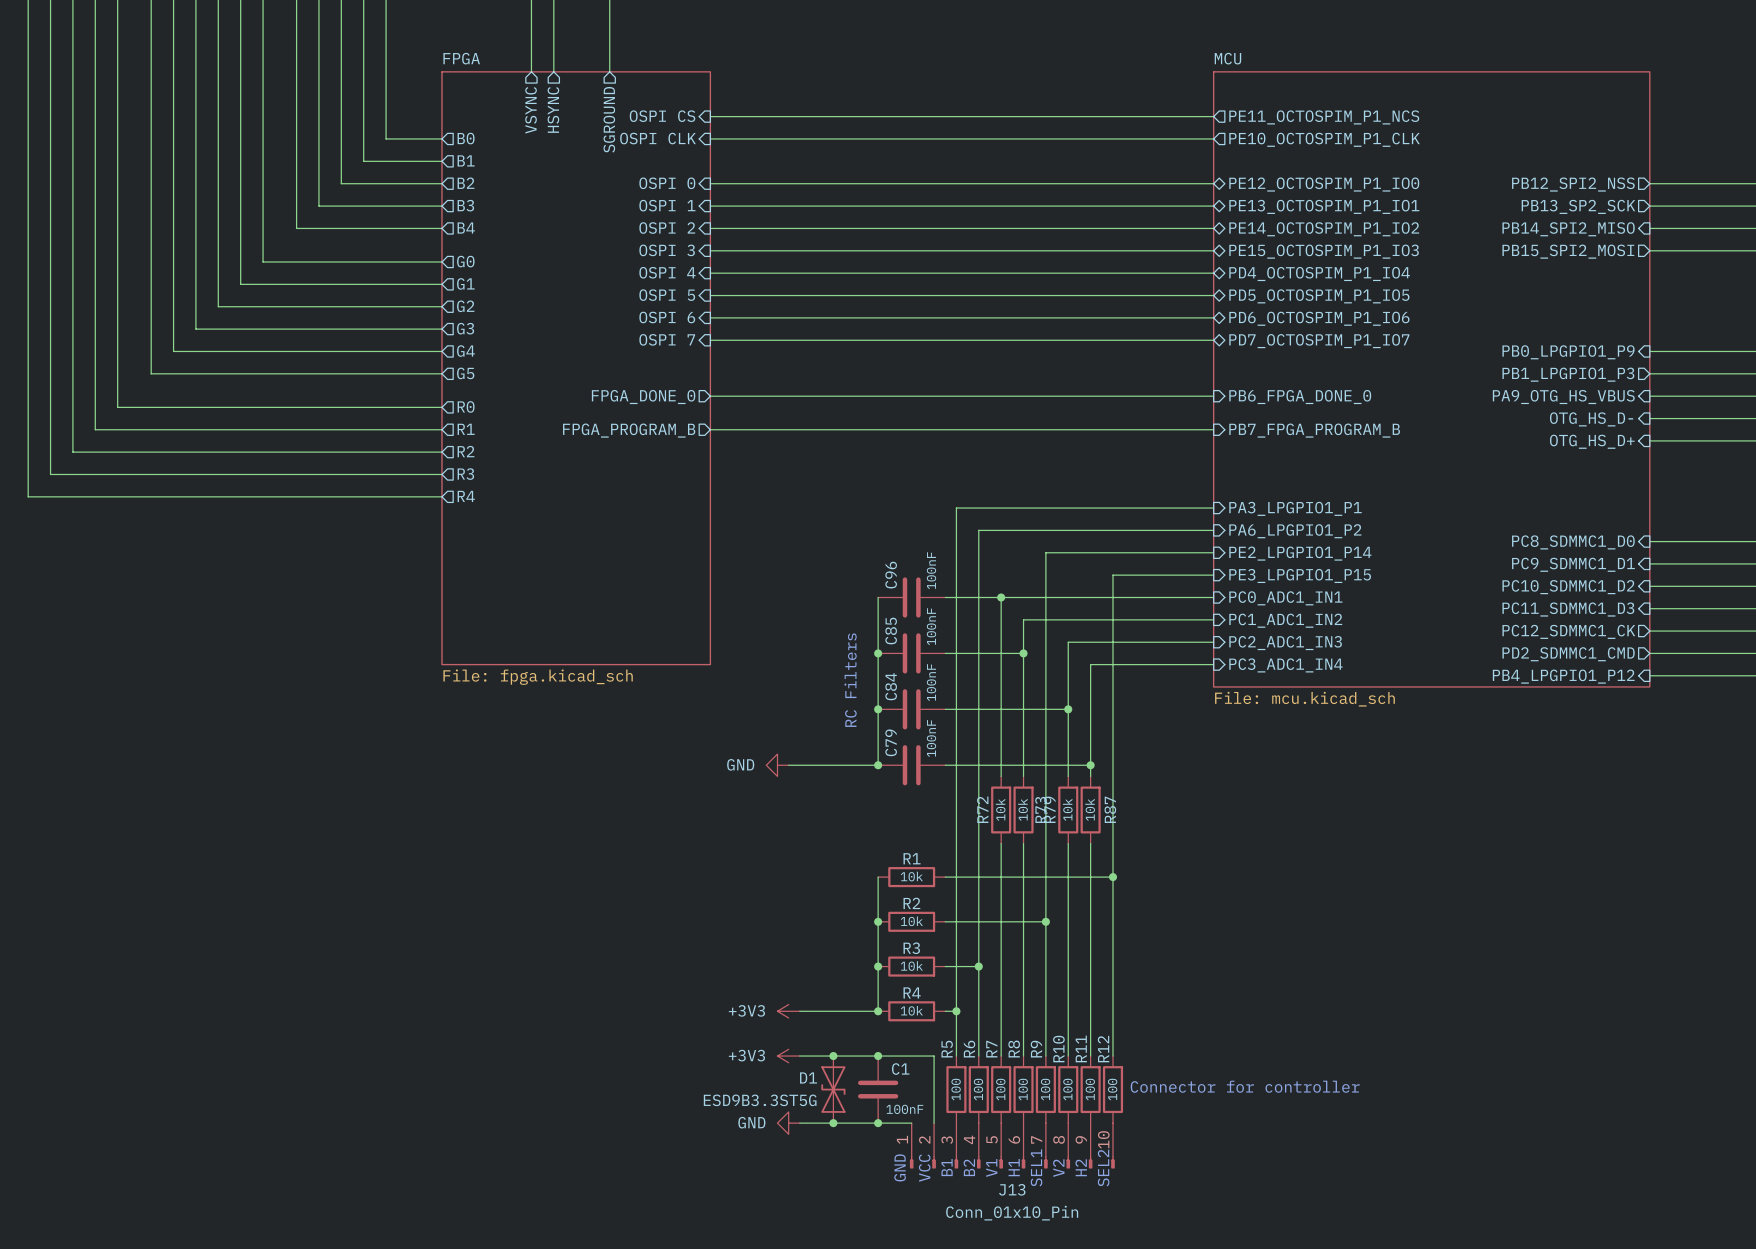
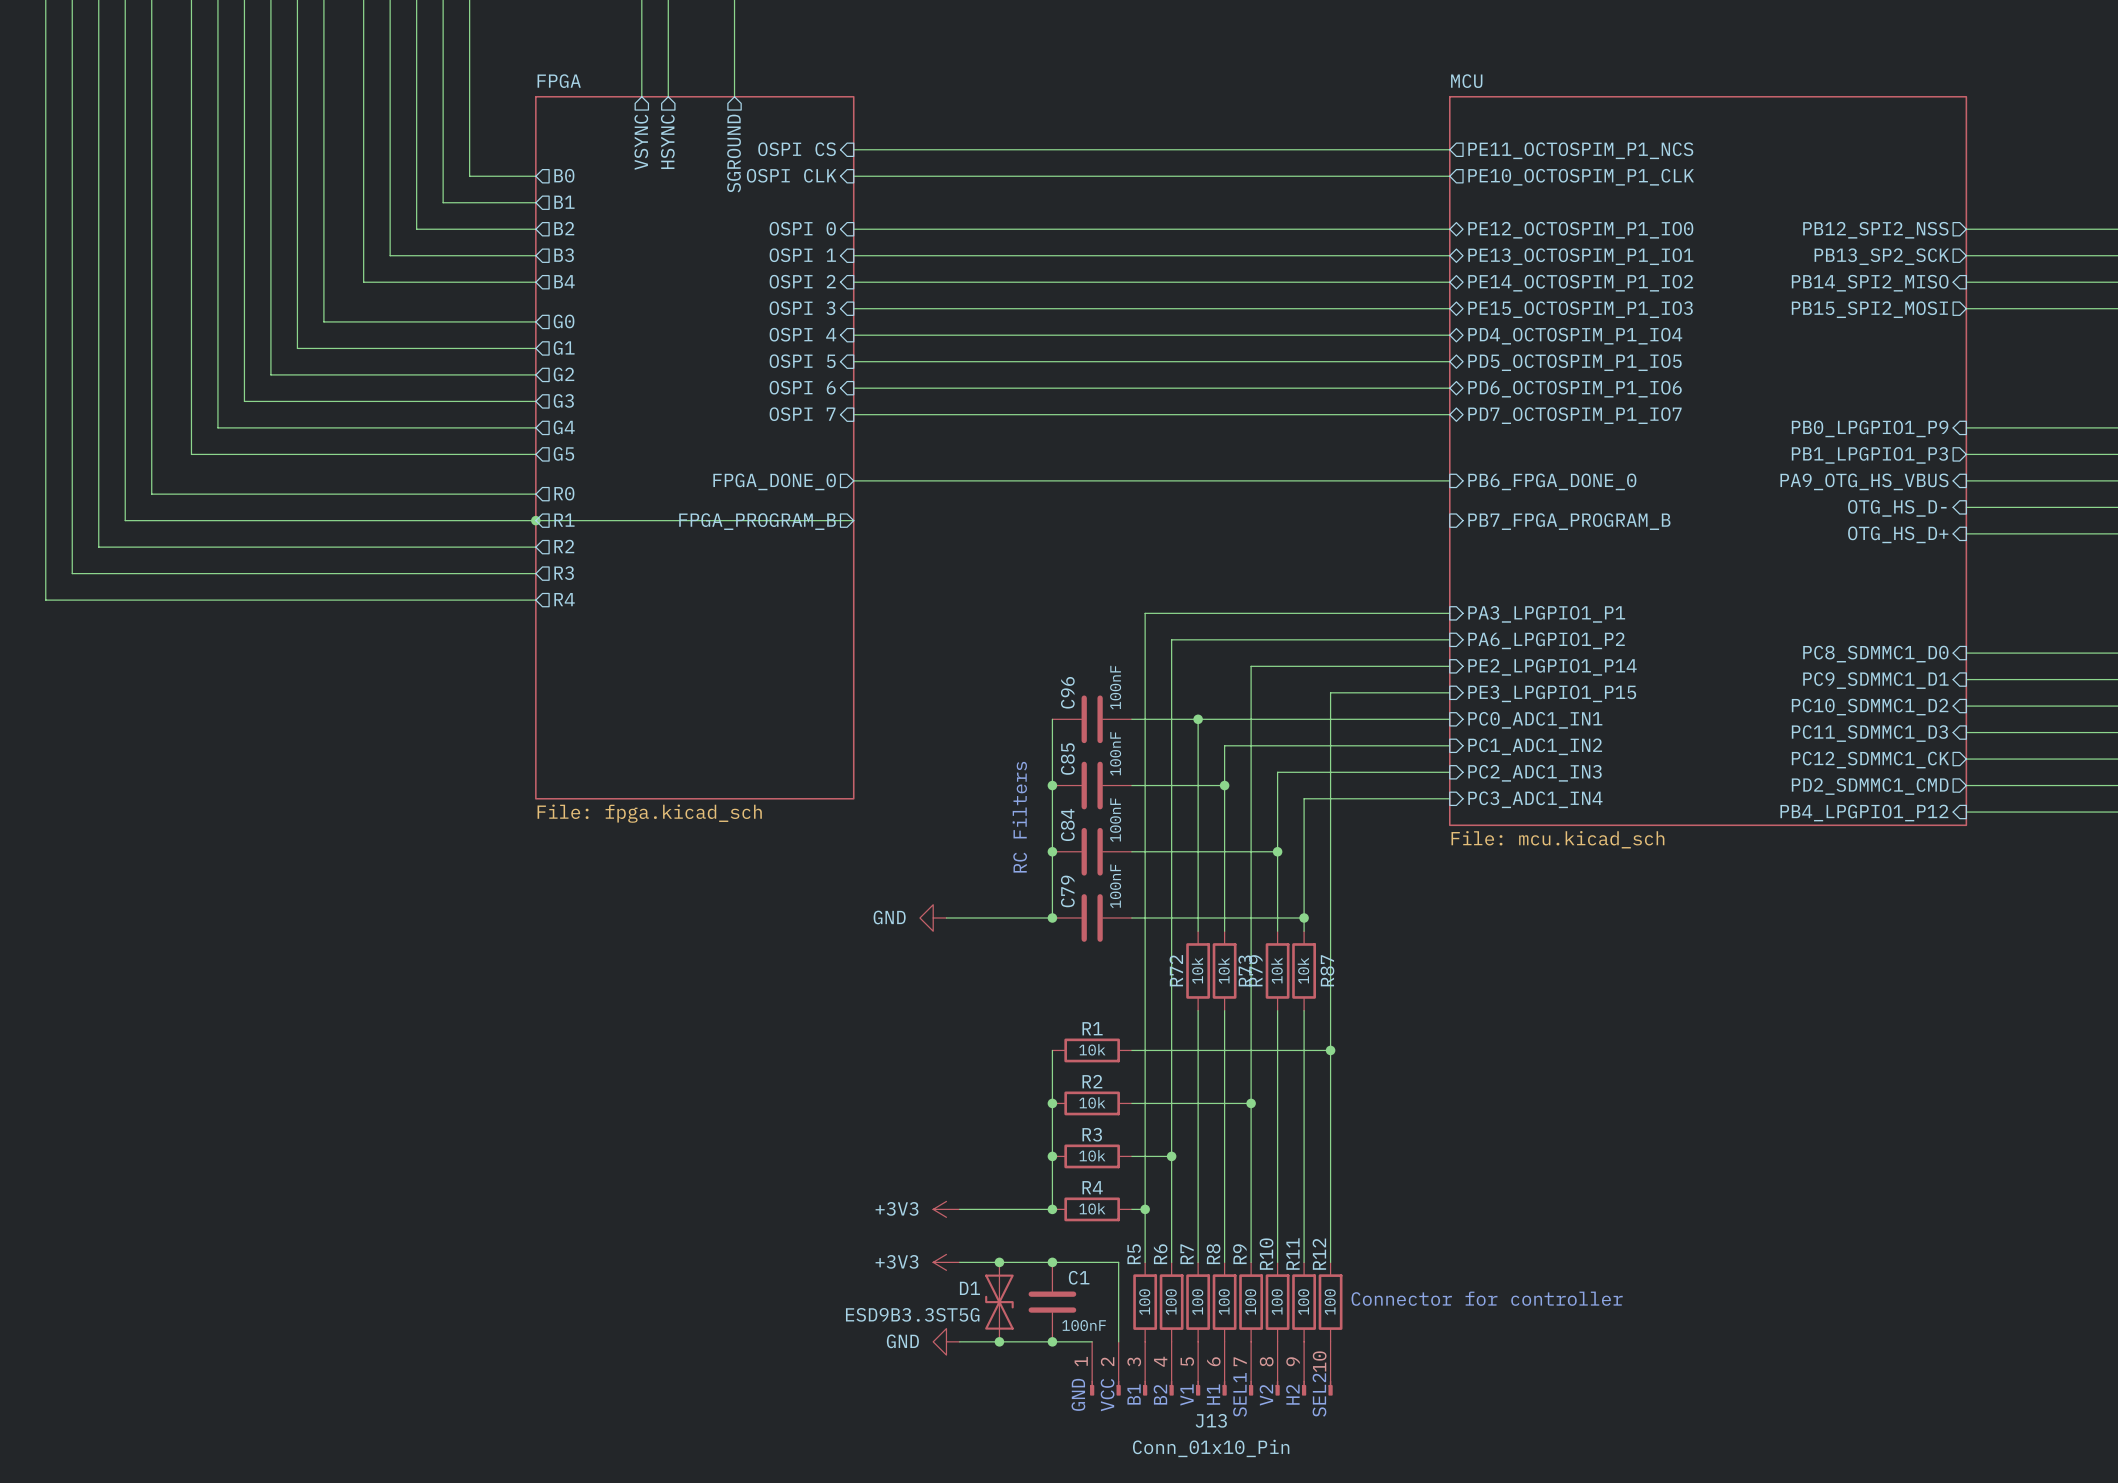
junction: none -> (535, 520)
wire: (710, 429) (1213, 429) -> (853, 520) (535, 520)

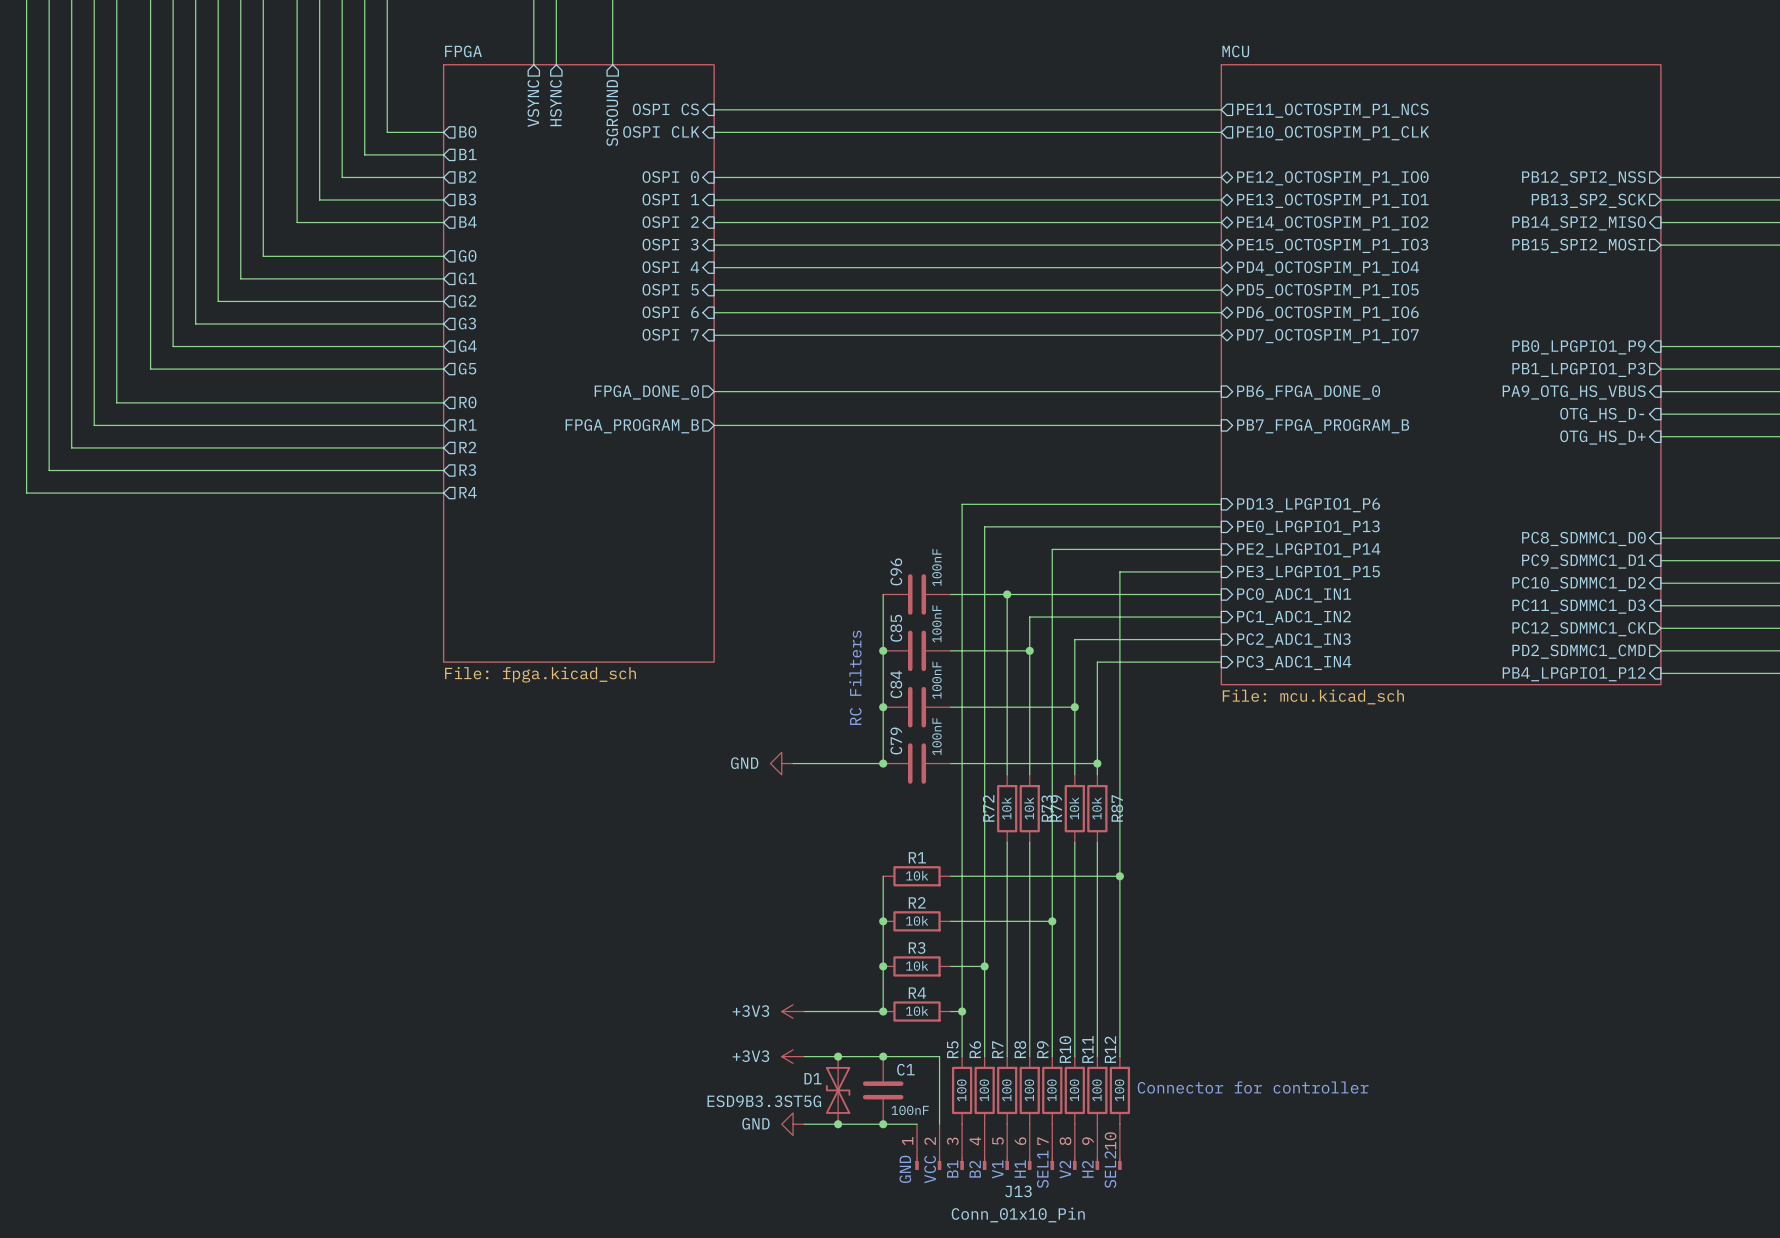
wire: (535, 520) (853, 520) -> (1221, 425) (714, 425)
junction: (535, 520) -> none
sheet pin: PA3_LPGPIO1_P1 (1546, 614) -> PD13_LPGPIO1_P6 (1308, 505)
sheet pin: PA6_LPGPIO1_P2 (1546, 640) -> PE0_LPGPIO1_P13 (1308, 527)

